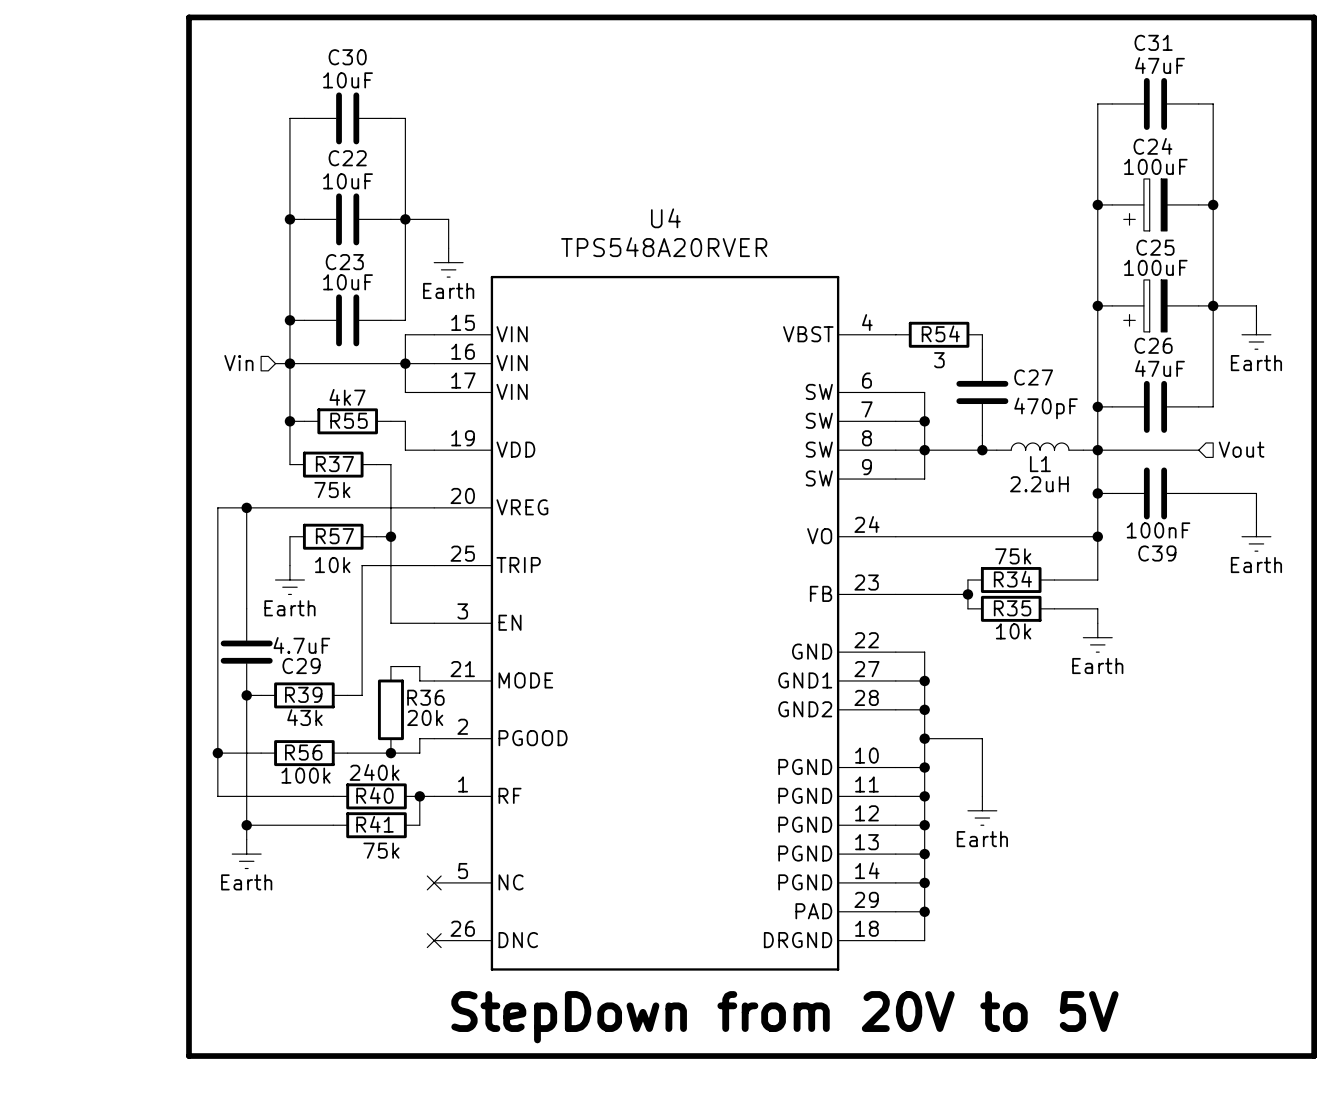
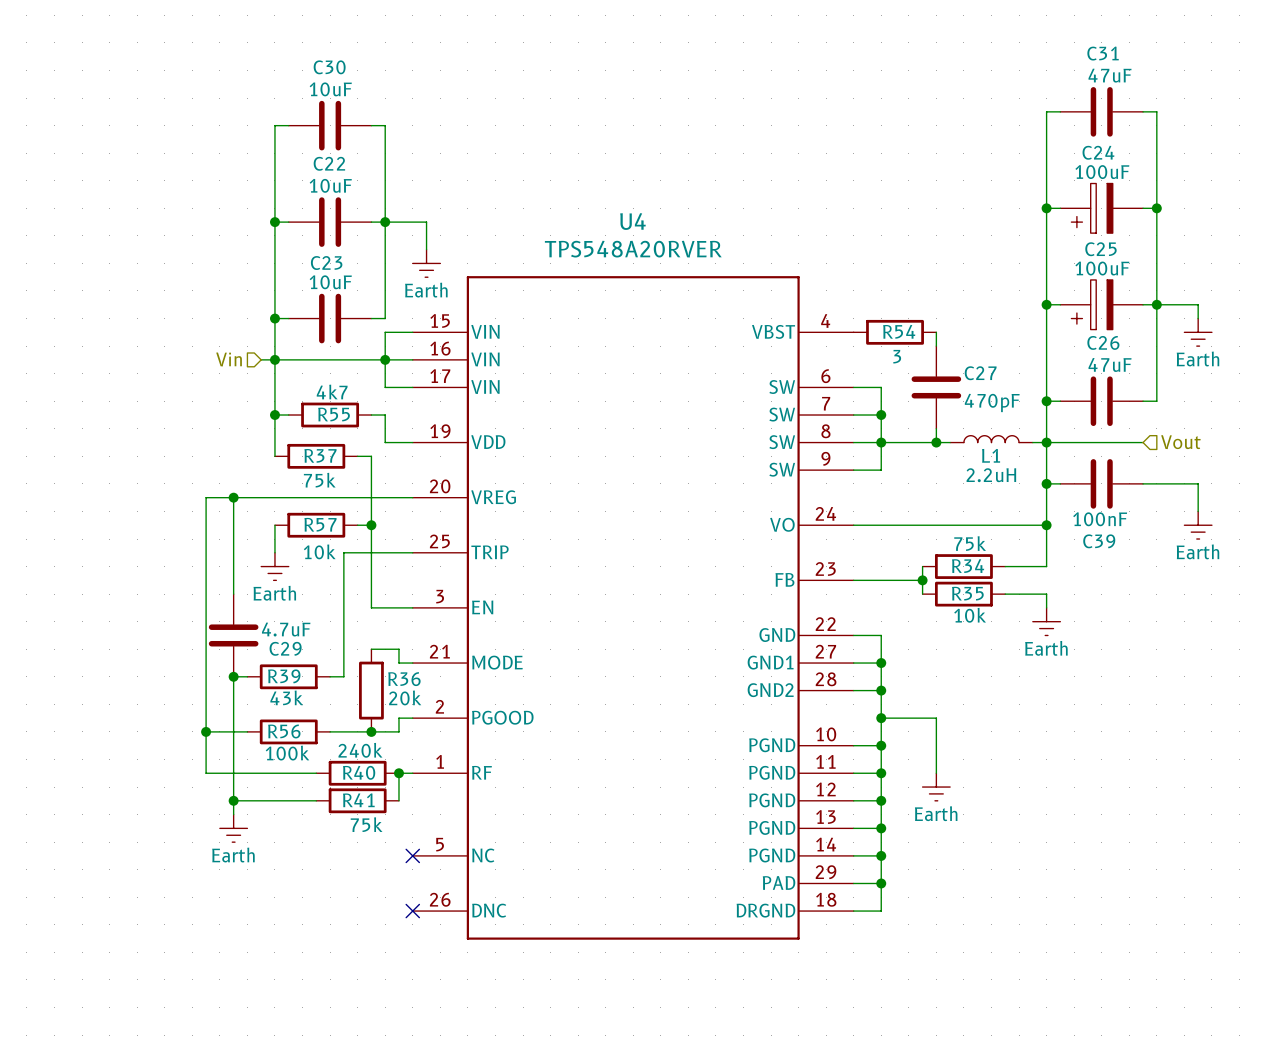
line: (188, 17) (1314, 17) (1314, 1056) (188, 1056) (188, 17) -> none
text: StepDown from 20V to 5V (784, 1017) -> none

